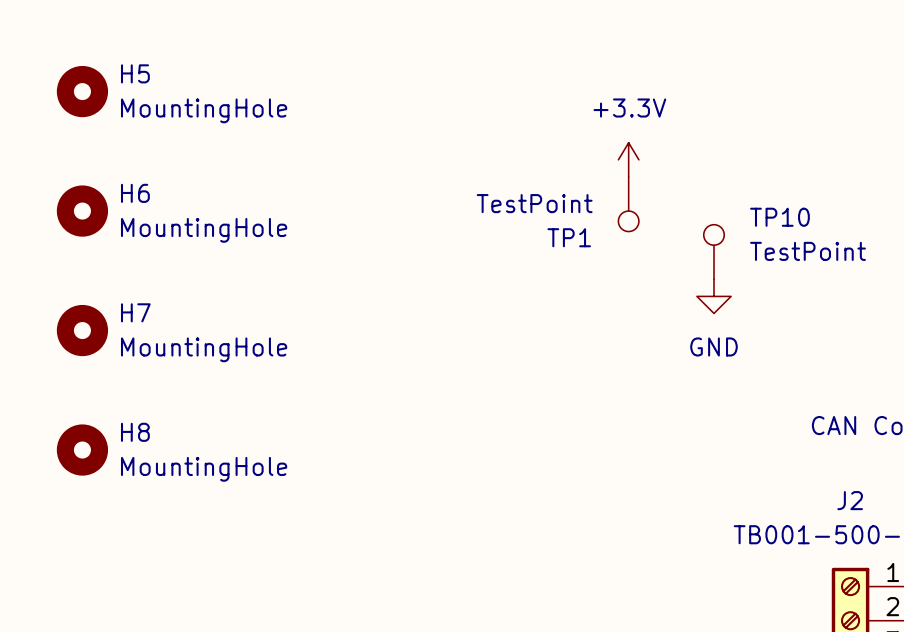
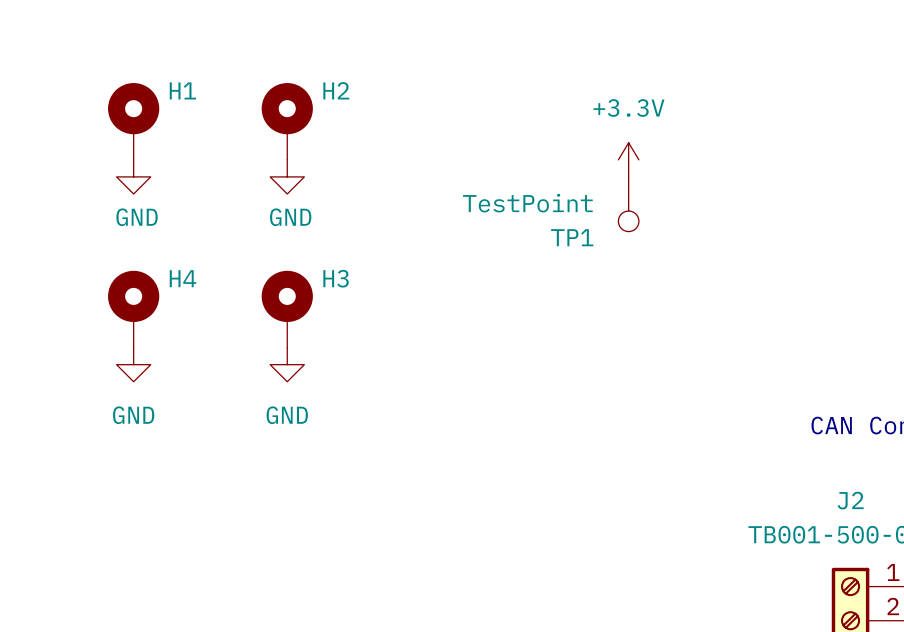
H5: MountingHole (82, 91) -> none
H1: none -> (133, 121)
H2: none -> (287, 121)
power symbol: none -> GND (133, 176)
power symbol: none -> GND (287, 176)
H6: MountingHole (82, 211) -> none
TP10: TestPoint (714, 252) -> none
power symbol: GND (714, 296) -> none
H4: none -> (133, 309)
H3: none -> (287, 309)
H7: MountingHole (82, 330) -> none
power symbol: none -> GND (133, 364)
power symbol: none -> GND (287, 364)
H8: MountingHole (82, 450) -> none

